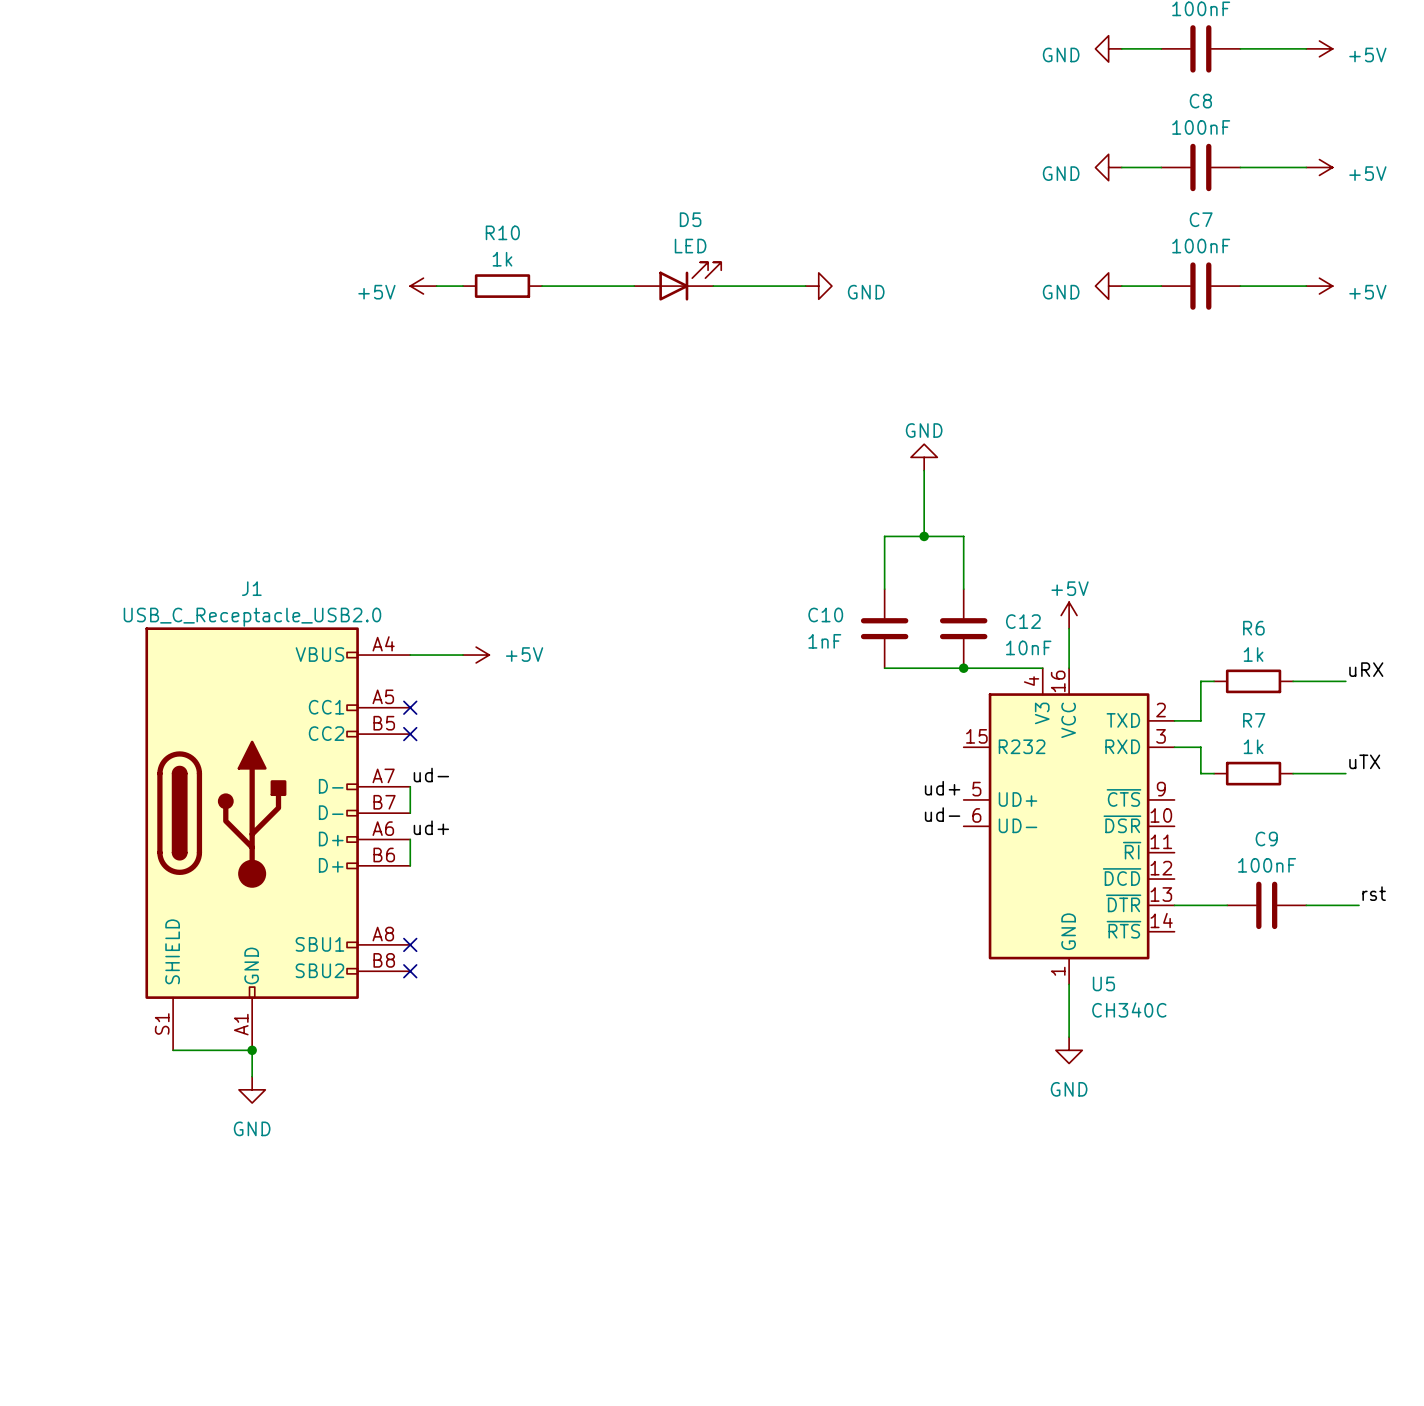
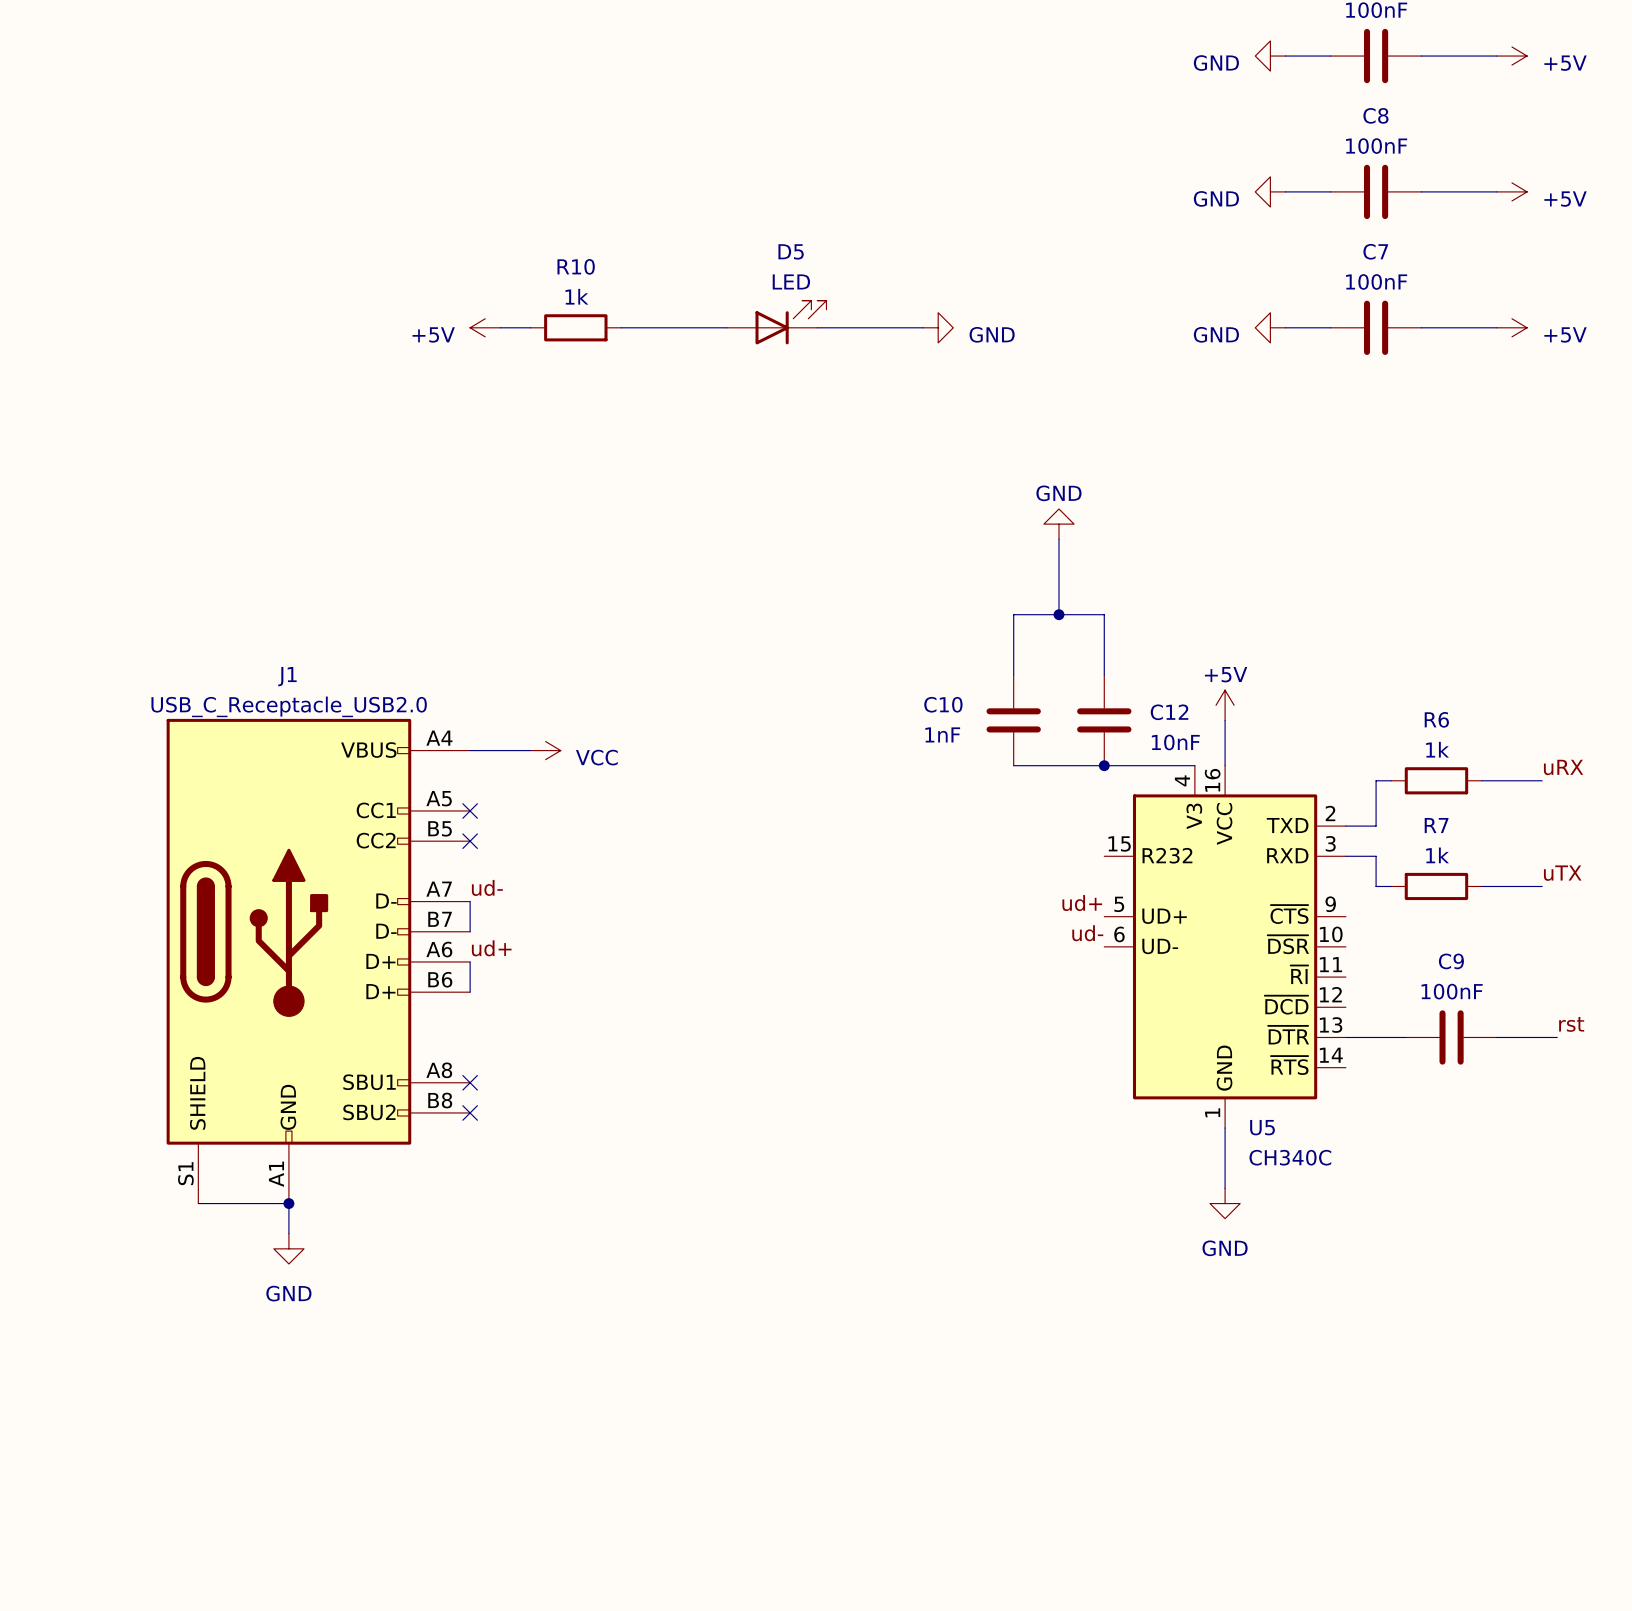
power symbol: +5V (476, 655) -> VCC (545, 750)

